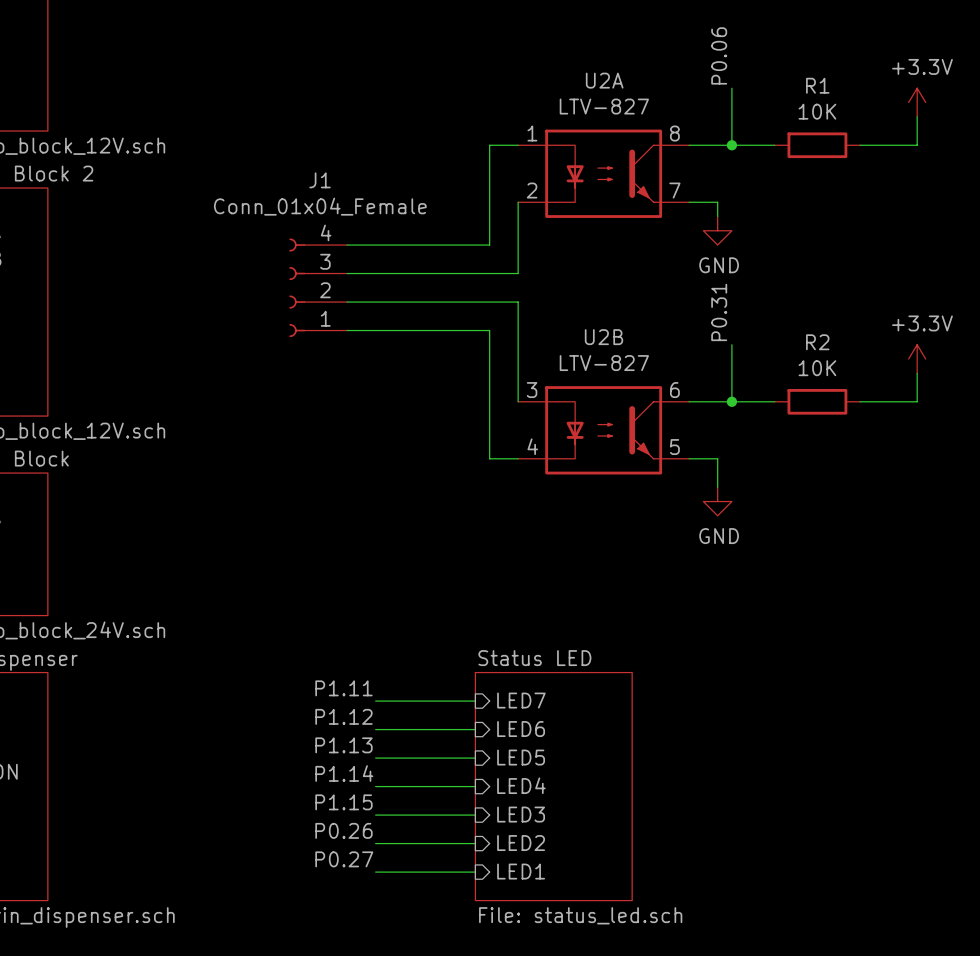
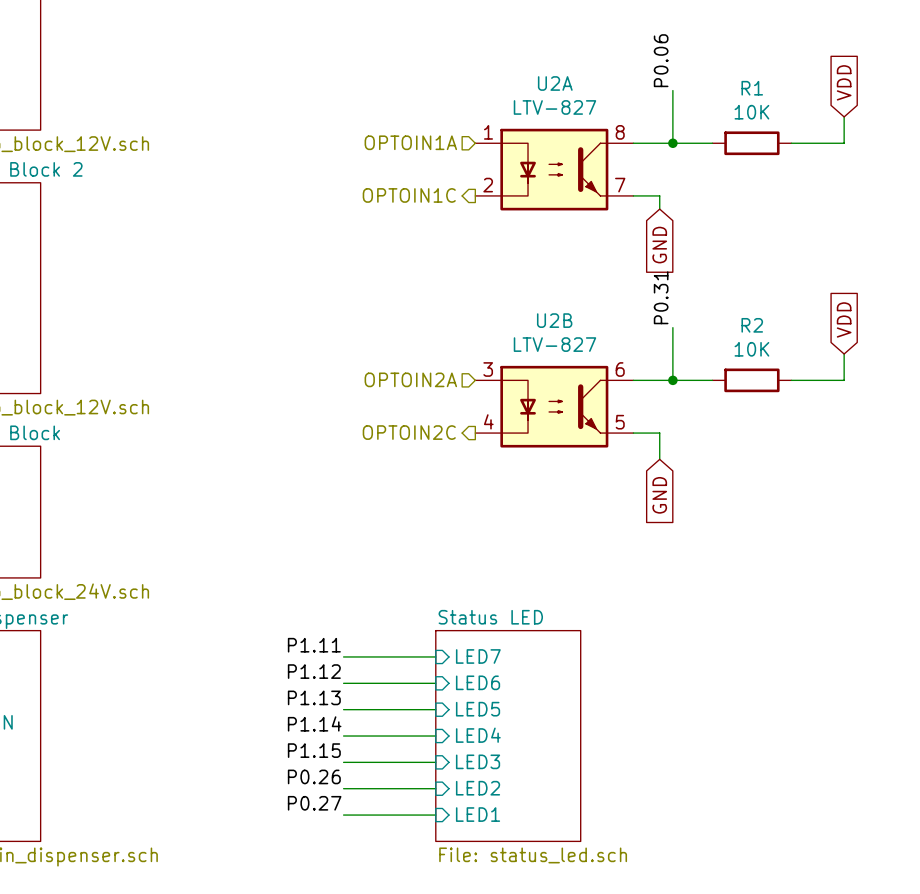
global label: none -> VDD (844, 82)
power symbol: +3.3V (917, 102) -> none
hierarchical label: none -> OPTOIN1A (410, 142)
wire: (518, 145) (489, 145) (489, 245) (347, 245) -> none
hierarchical label: none -> OPTOIN1C (409, 195)
wire: (518, 202) (518, 273) (347, 273) -> none
power symbol: GND (717, 230) -> none
global label: none -> GND (659, 245)
J1: Conn_01x04_Female (318, 287) -> none
wire: (347, 302) (518, 302) (518, 401) -> none
wire: (347, 330) (489, 330) (489, 458) (518, 458) -> none
global label: none -> VDD (844, 319)
power symbol: +3.3V (917, 359) -> none
hierarchical label: none -> OPTOIN2A (410, 379)
hierarchical label: none -> OPTOIN2C (409, 432)
power symbol: GND (717, 501) -> none
global label: none -> GND (659, 495)

